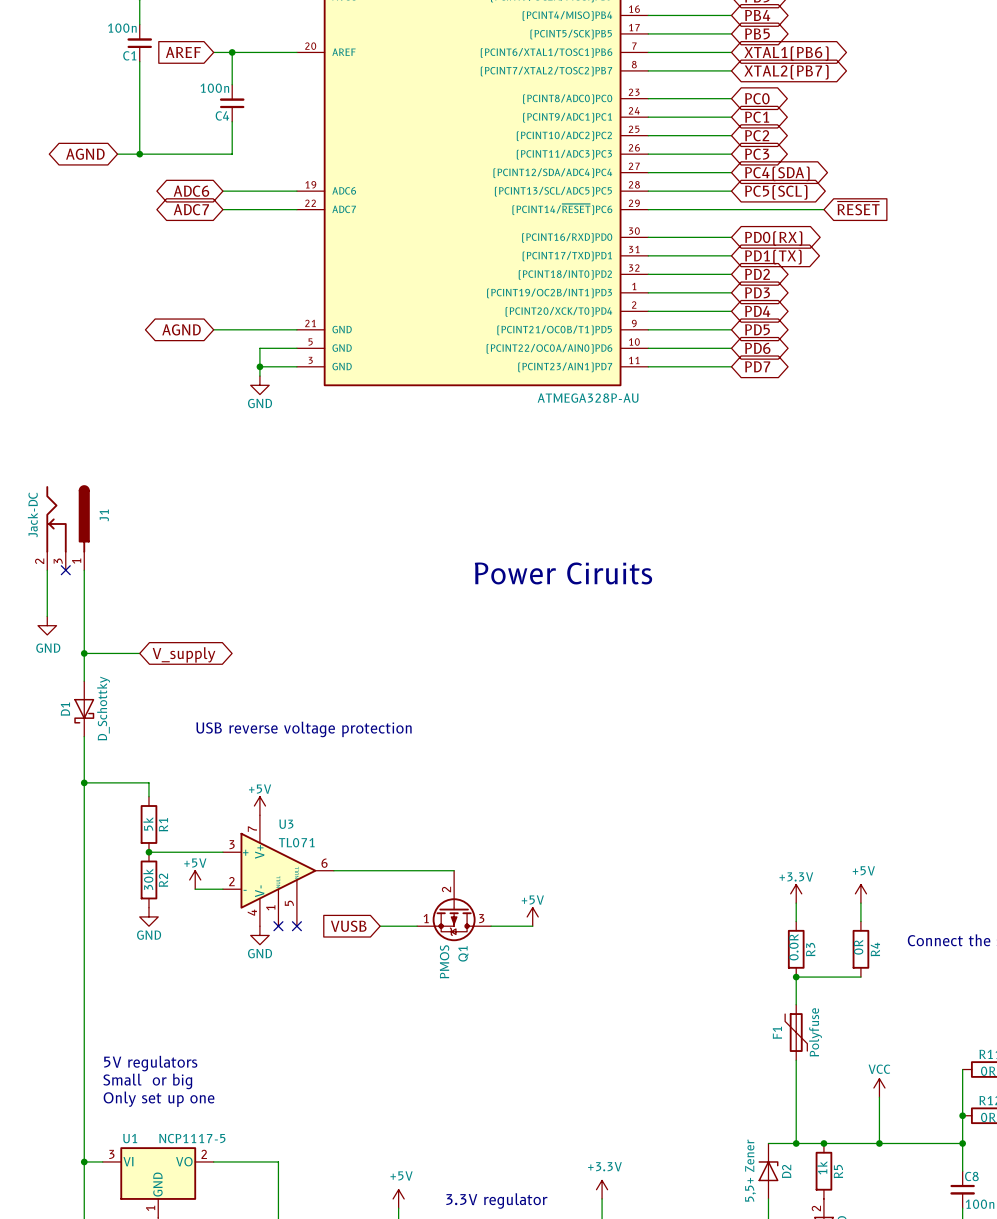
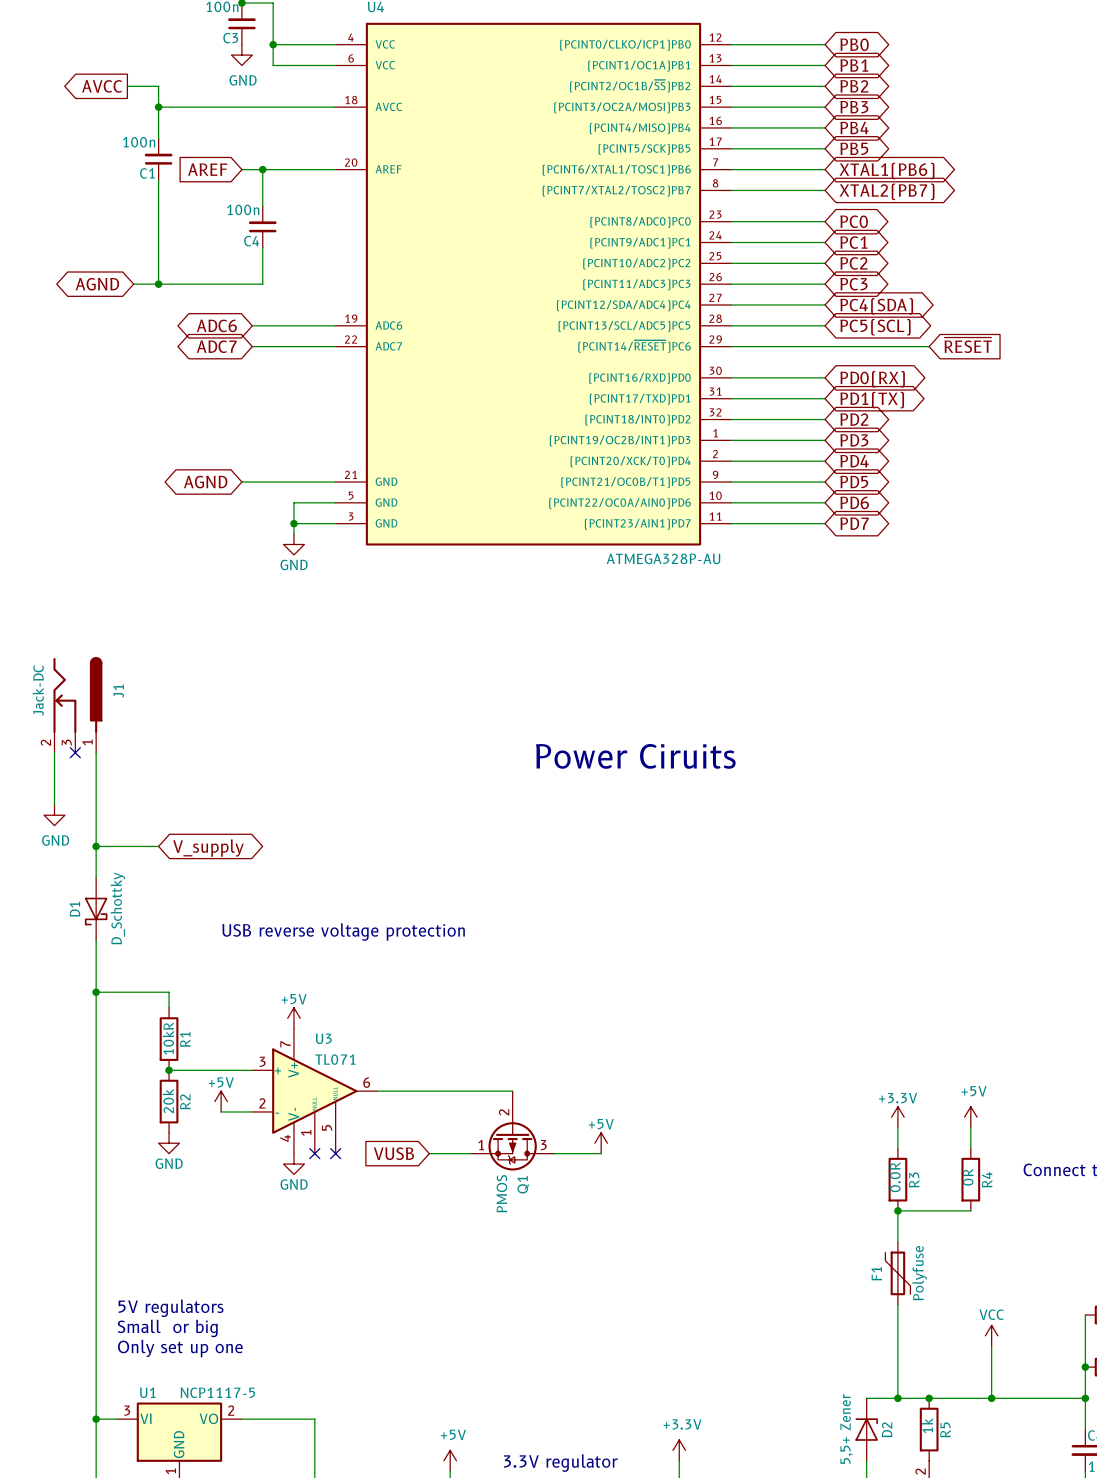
R1 value: 5k (148, 823) -> 10kR (168, 1038)
R2 value: 30k (148, 879) -> 20k (168, 1101)

